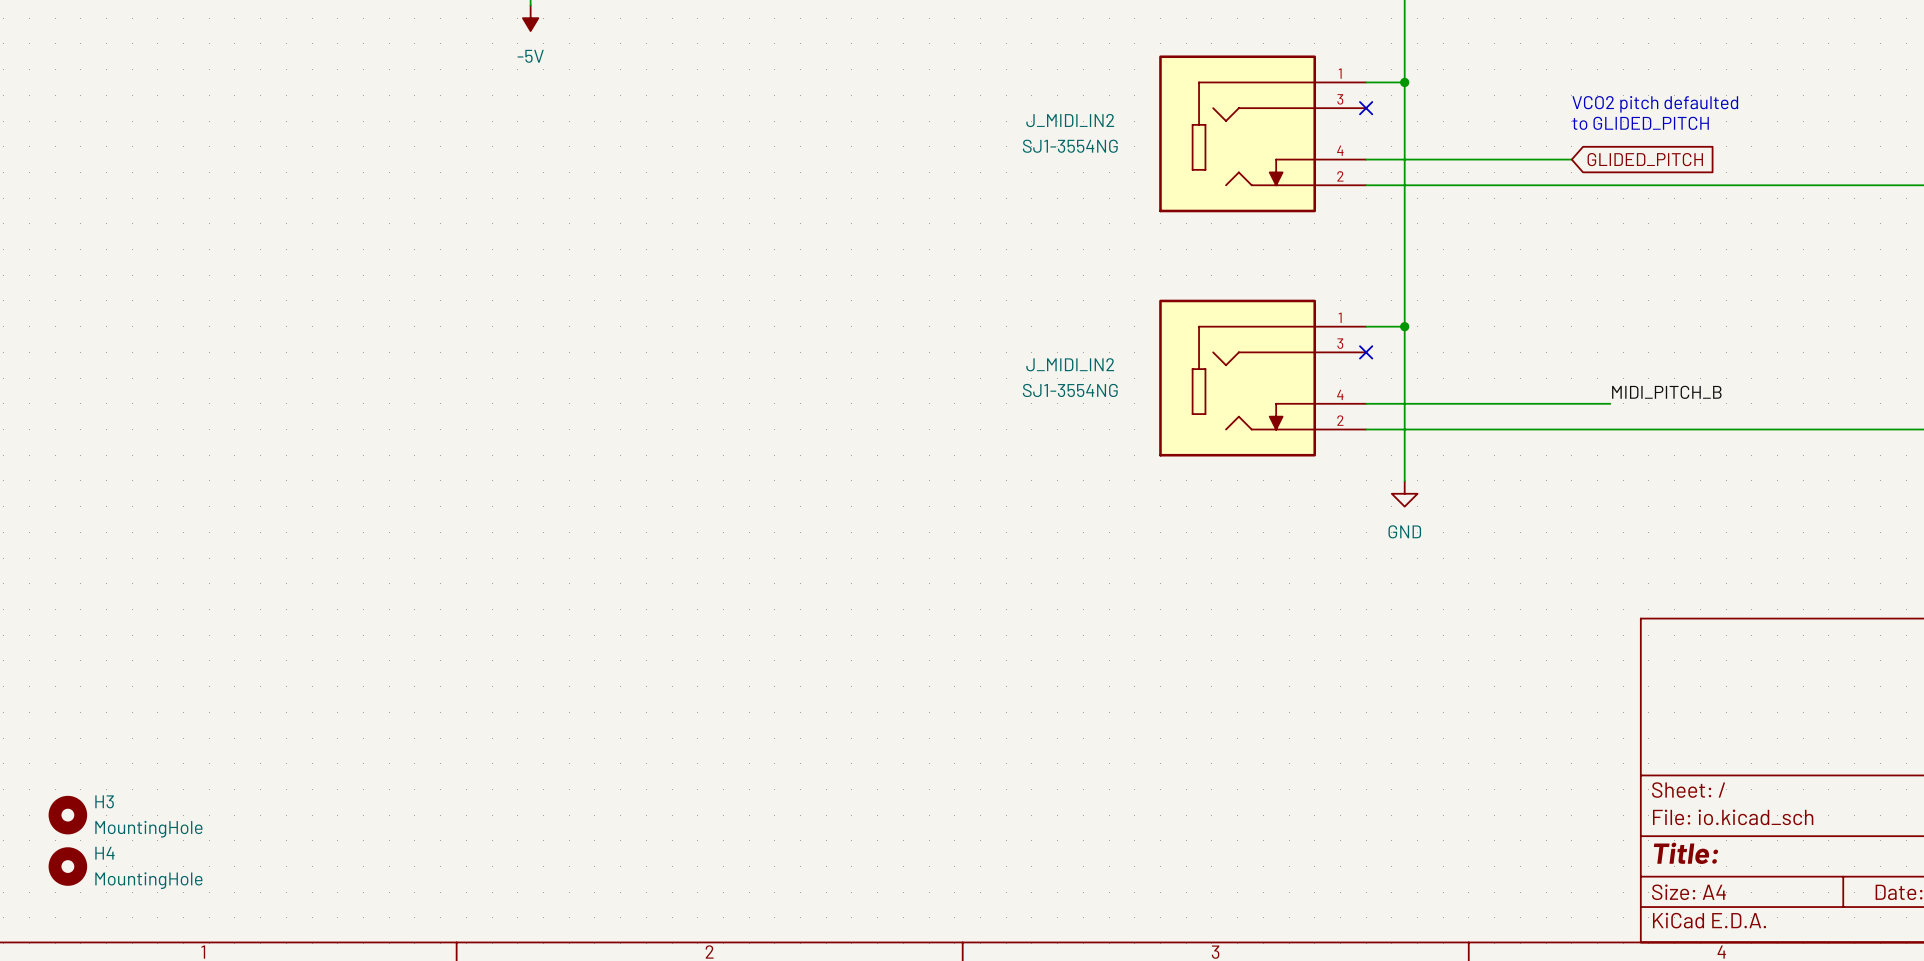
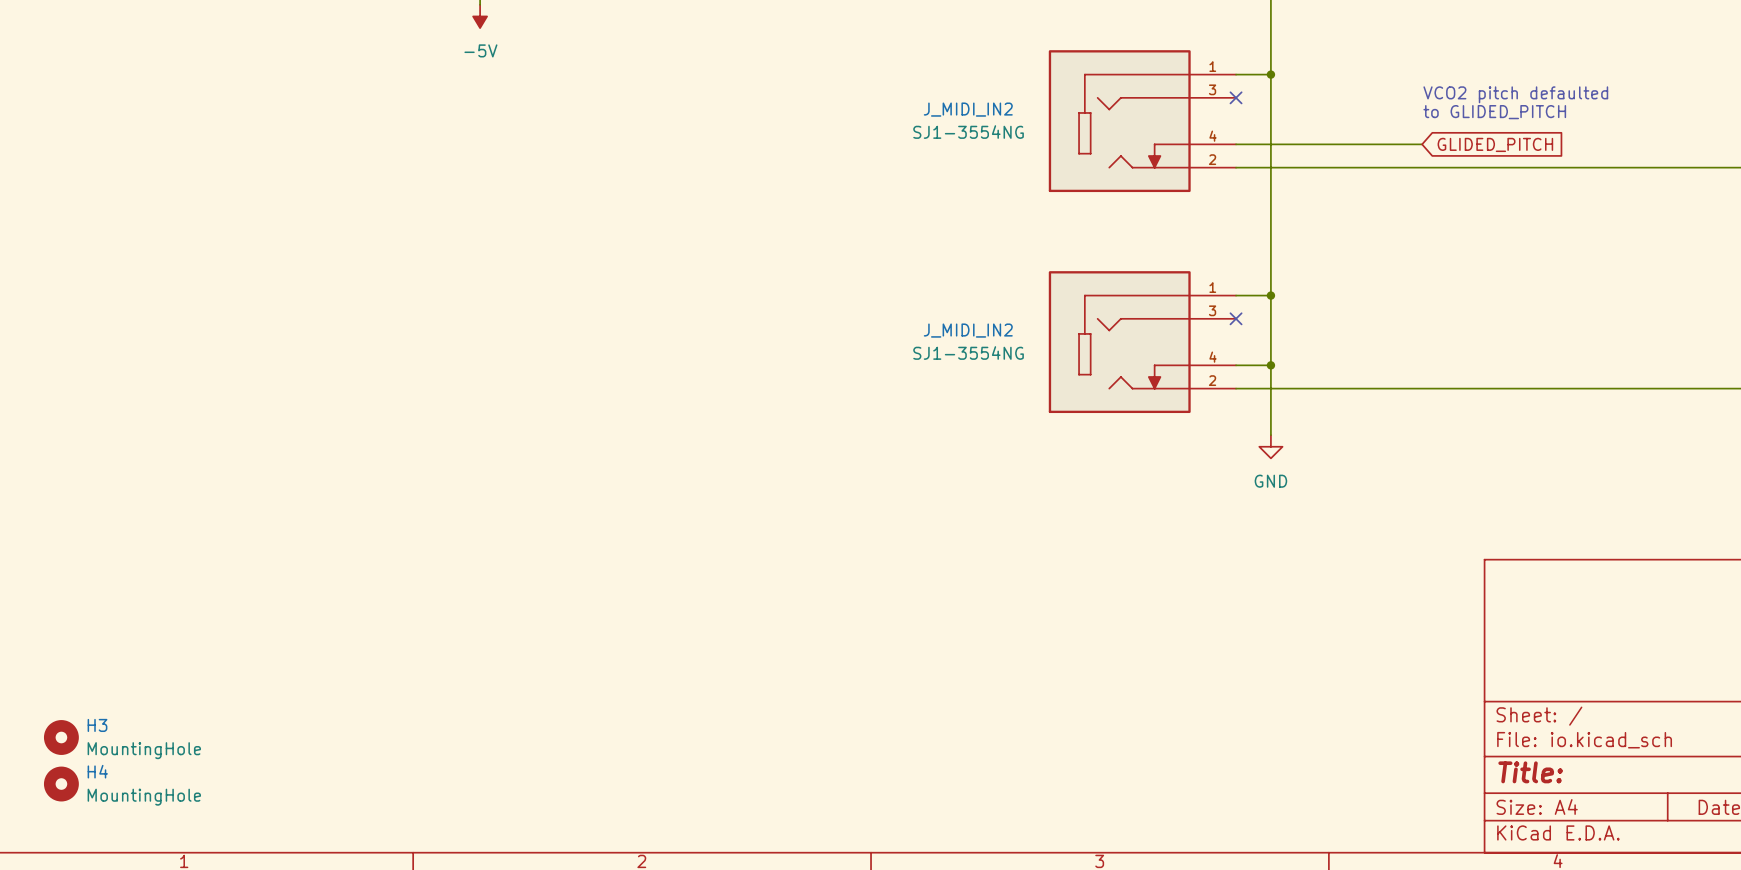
label: MIDI_PITCH_B (1666, 392) -> none
wire: (1404, 403) (1610, 403) -> none
junction: none -> (1270, 365)

